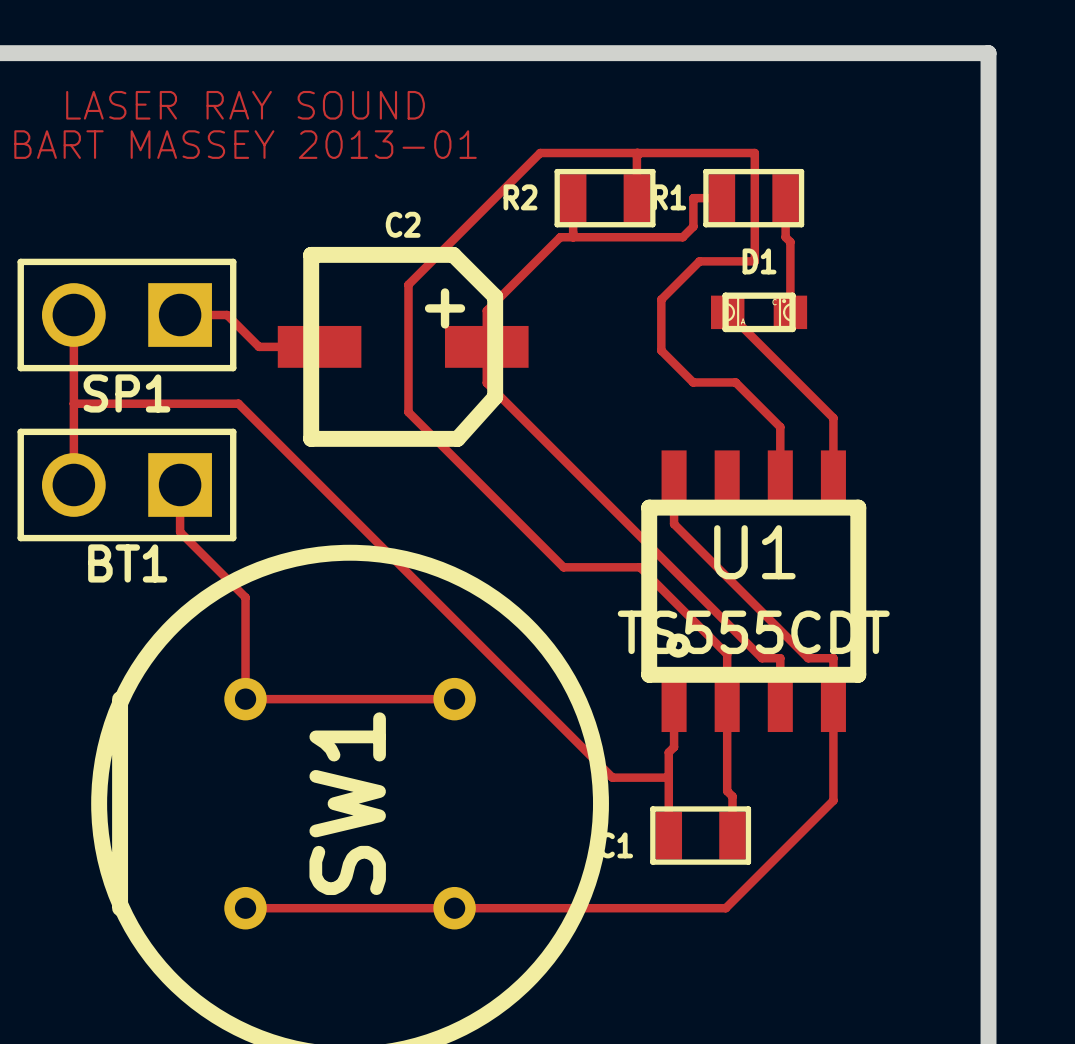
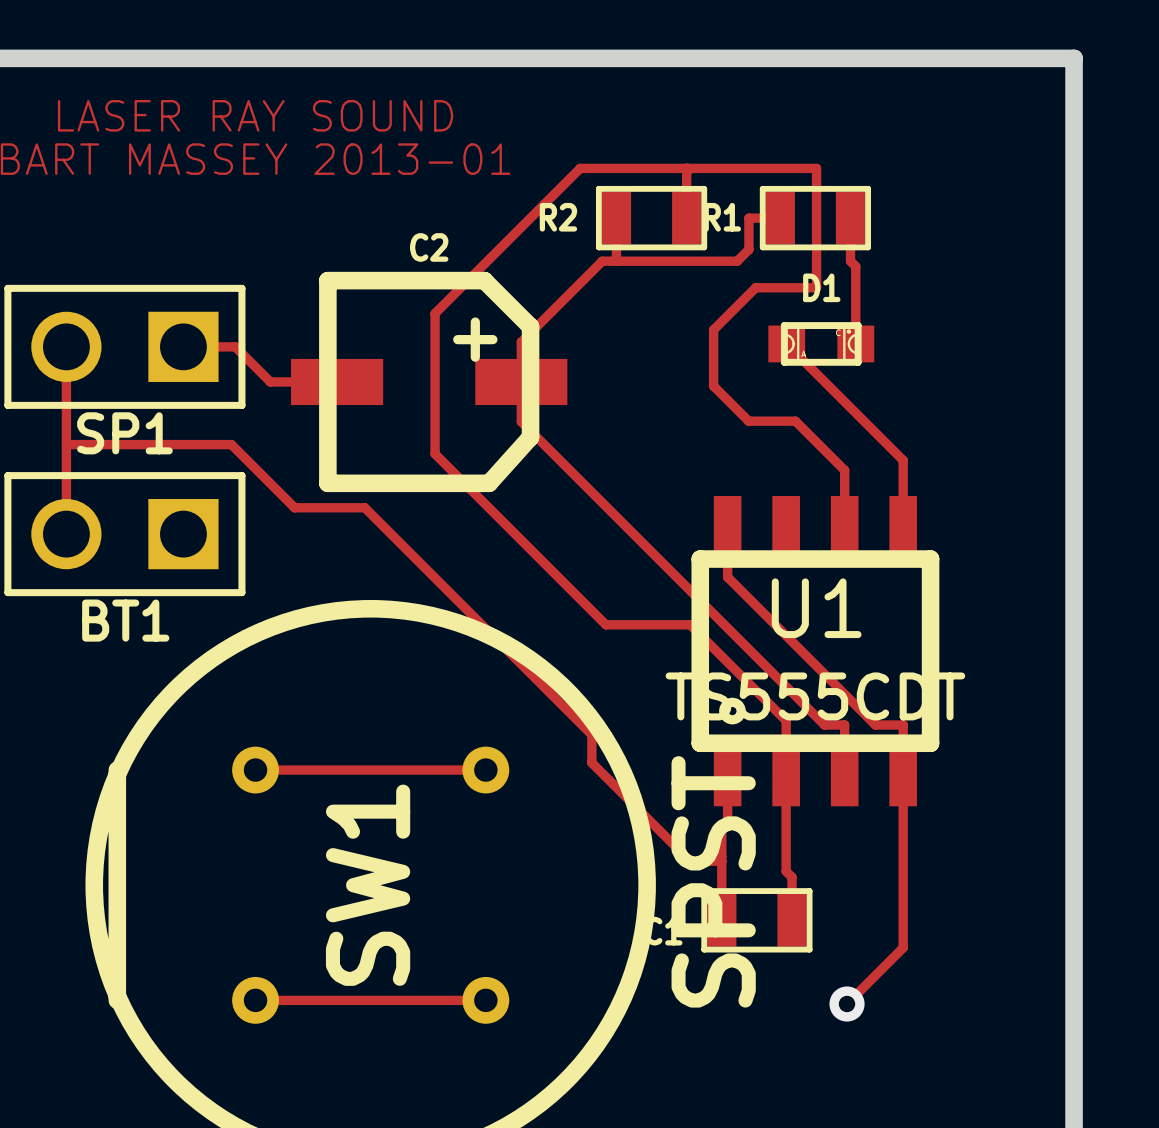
track: (223, 403) (238, 403) (612, 777) (668, 777) -> (231, 444) (294, 507) (364, 507) (591, 734) (591, 762) (690, 861) (721, 861)
track: (180, 484) (180, 532) (245, 597) (245, 699) -> none
SW1 value: none -> SPST (713, 881)
track: (833, 800) (725, 908) (454, 908) -> (903, 881) (903, 947) (847, 1004)
via: none -> (847, 1004)

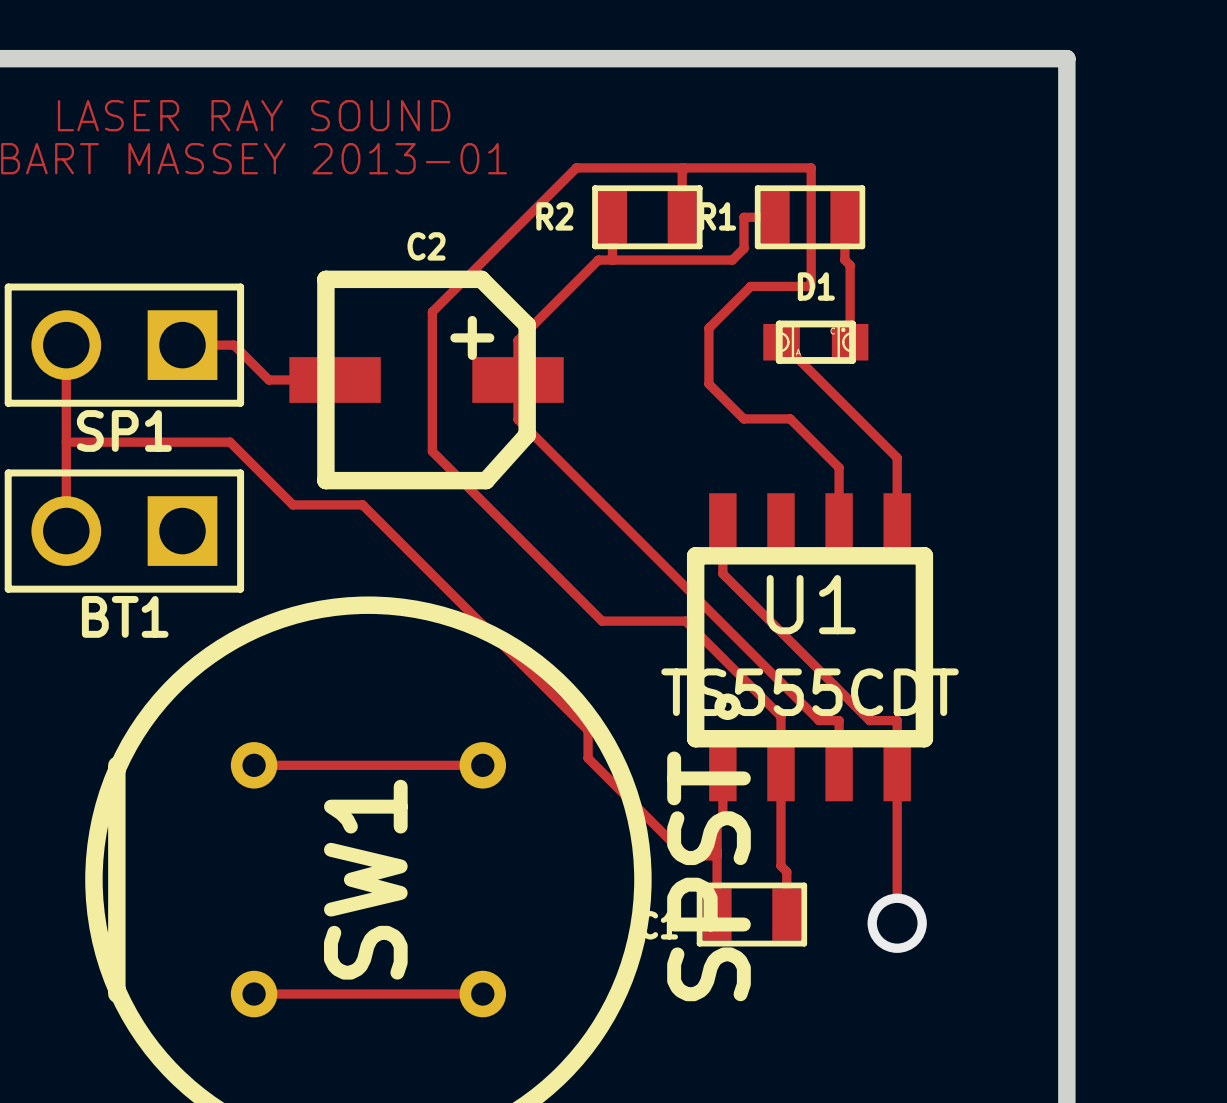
track: (903, 929) (903, 947) (847, 1004) -> none
via: none -> (897, 923)
via: (847, 1004) -> none

